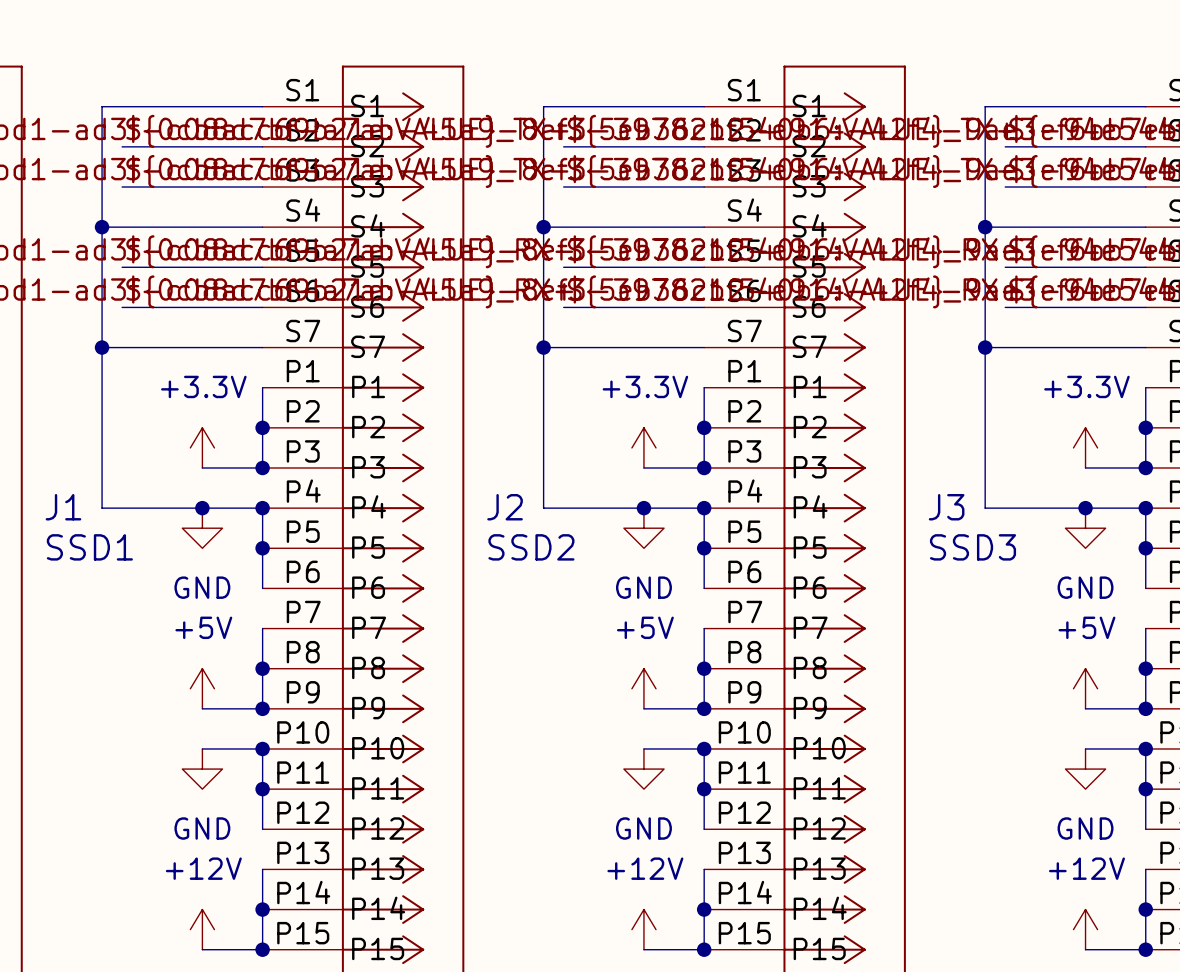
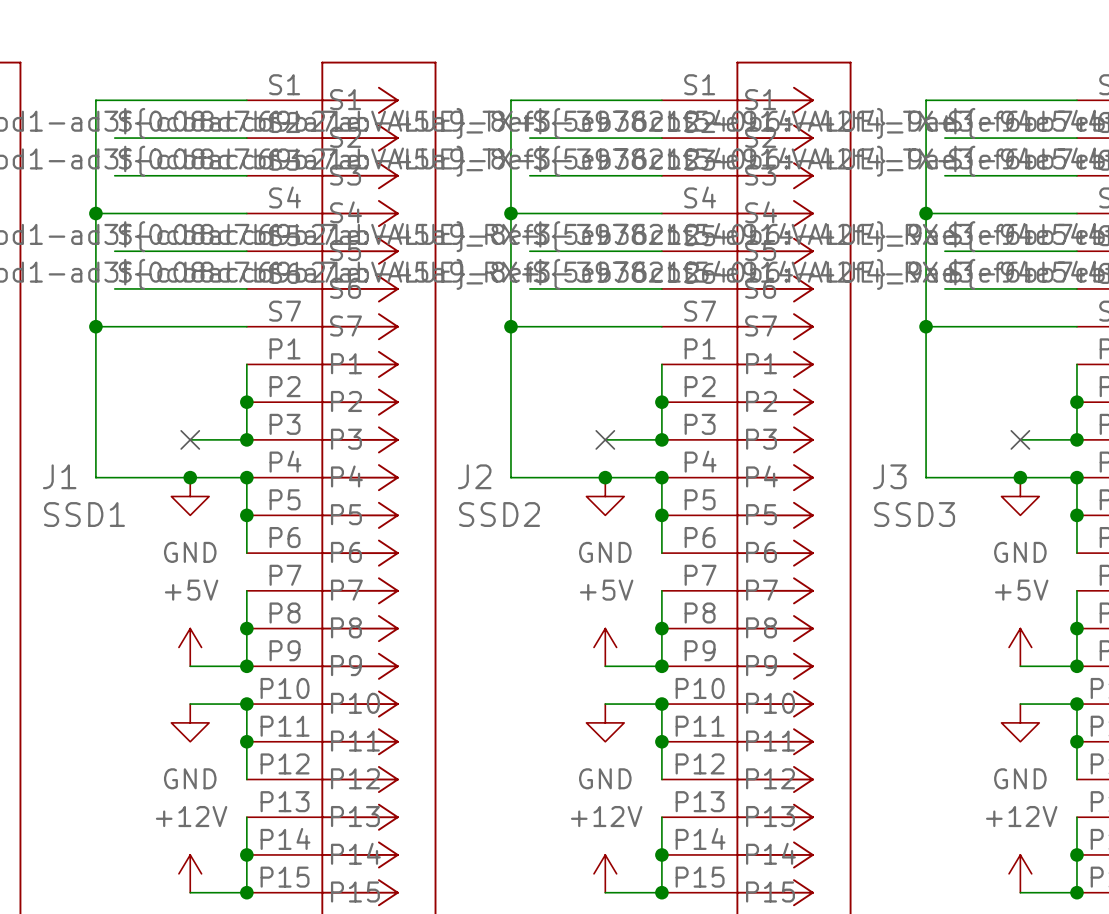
power symbol: +3.3V (202, 447) -> none
power symbol: +3.3V (643, 447) -> none
power symbol: +3.3V (1085, 447) -> none
no-connect mark: none -> (190, 439)
no-connect mark: none -> (605, 439)
no-connect mark: none -> (1020, 439)

